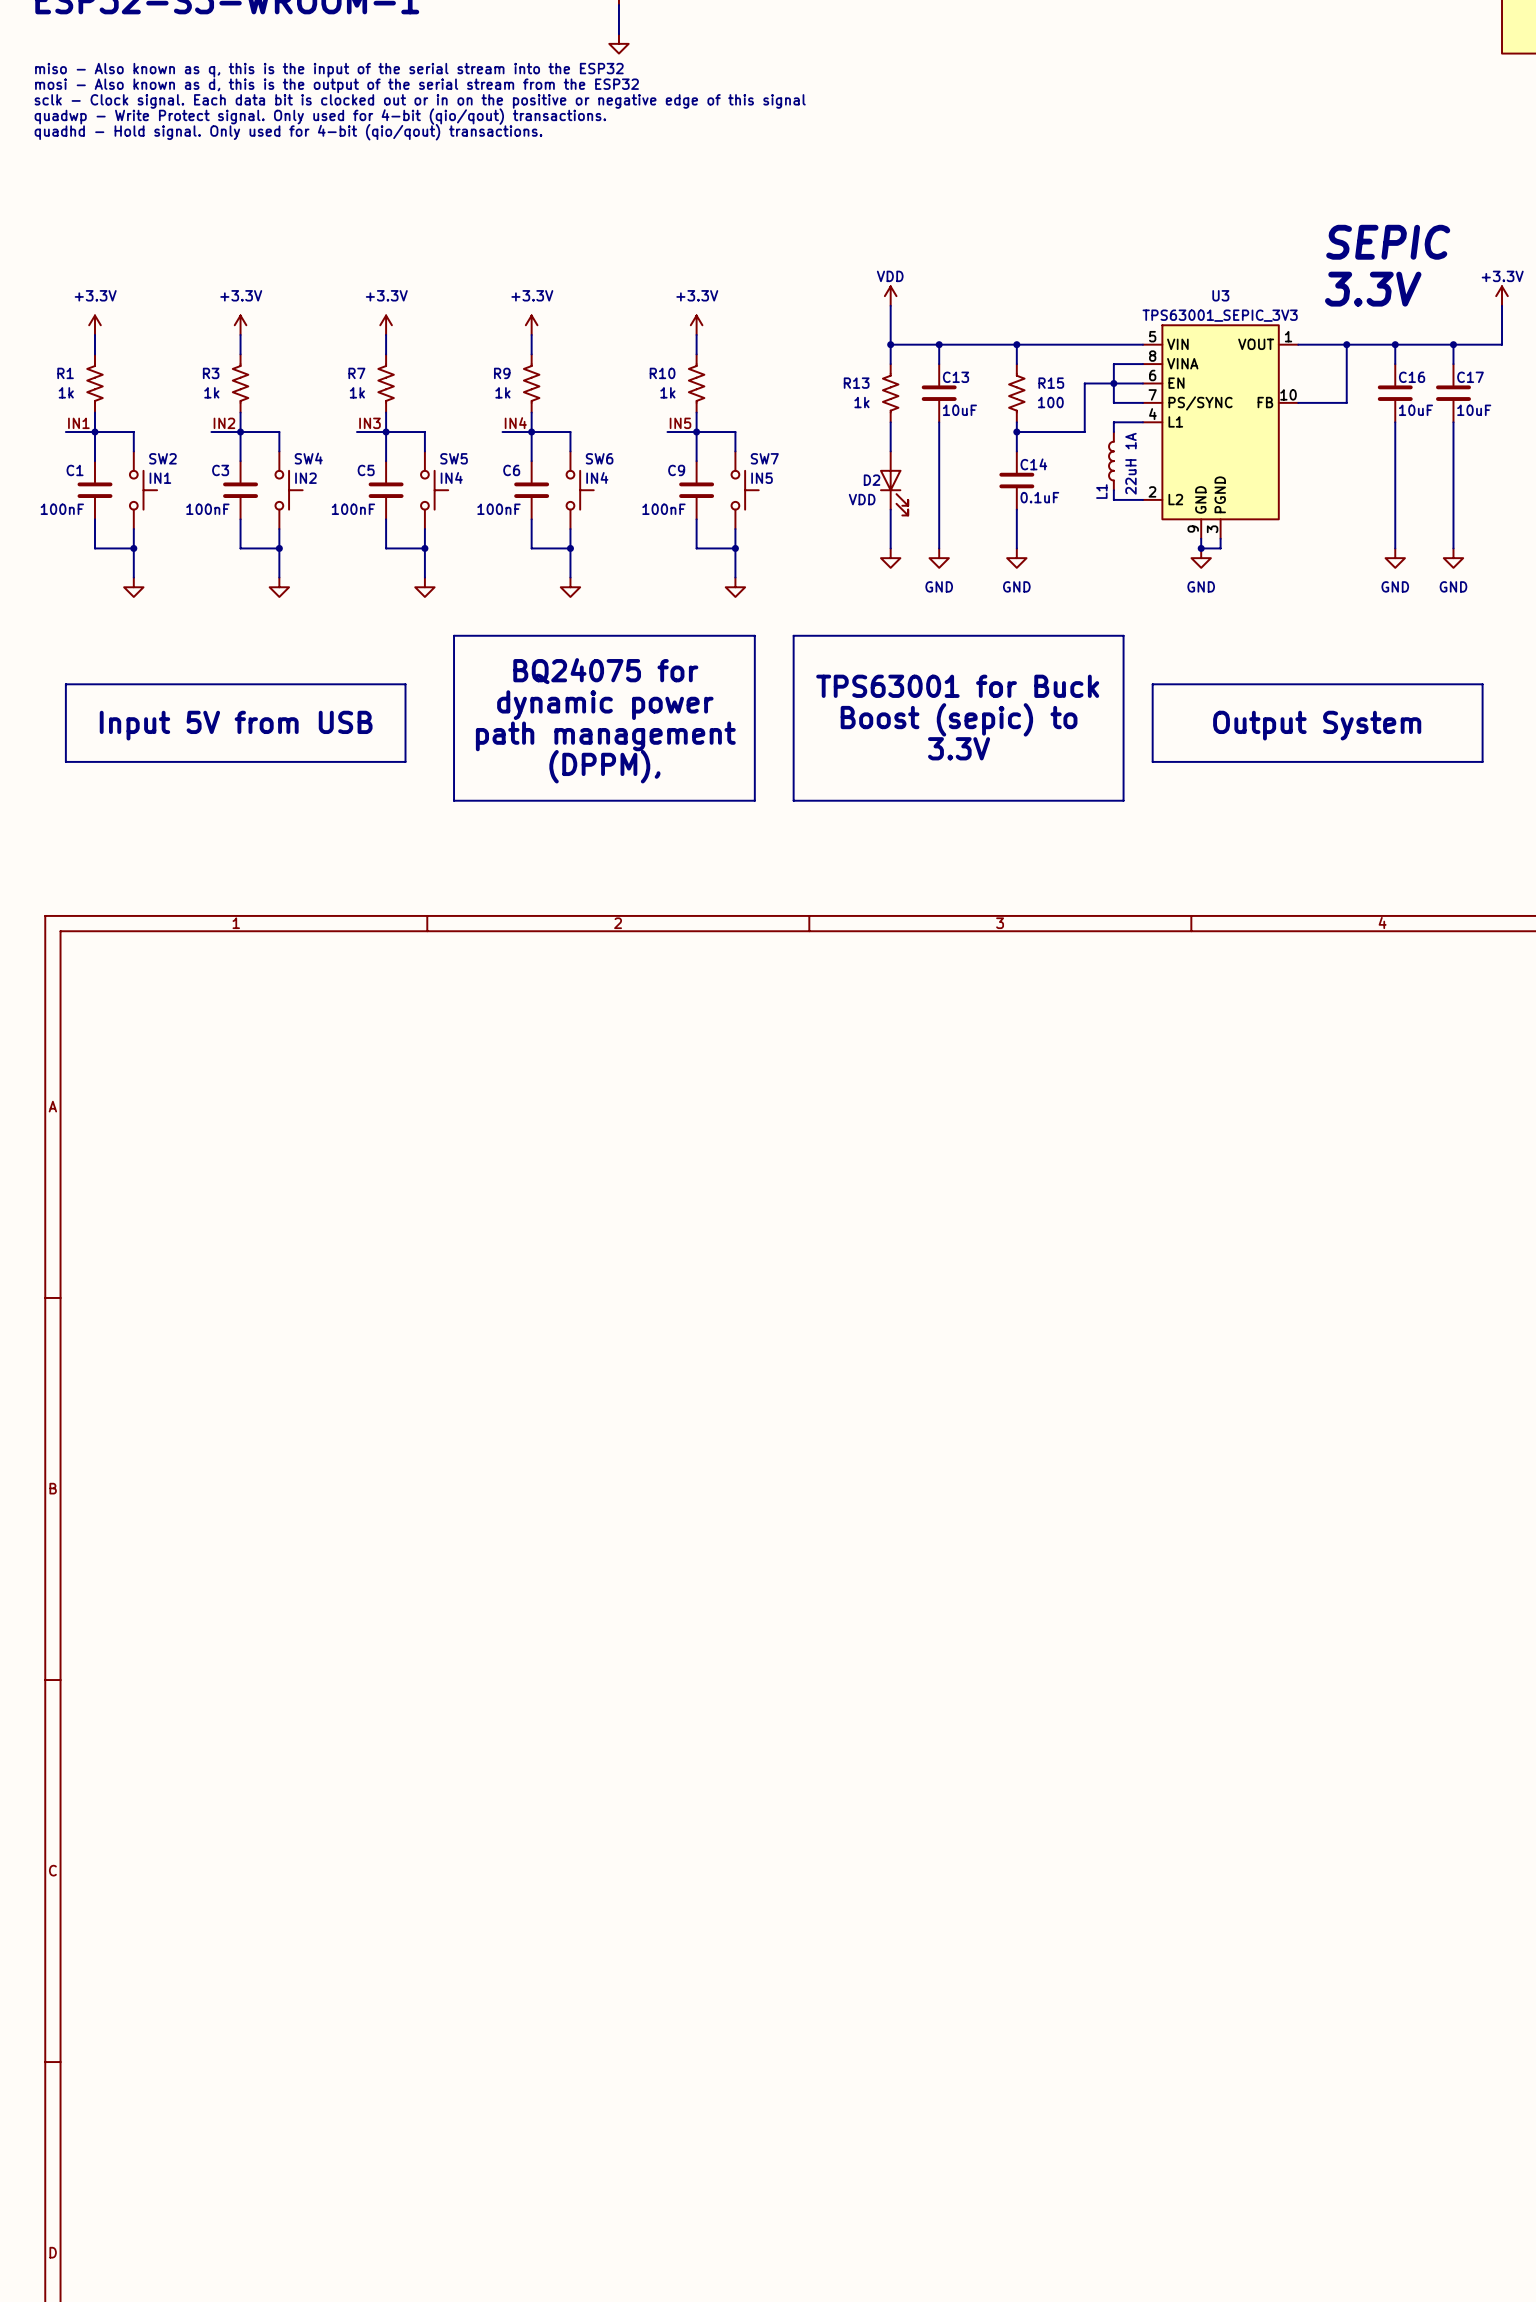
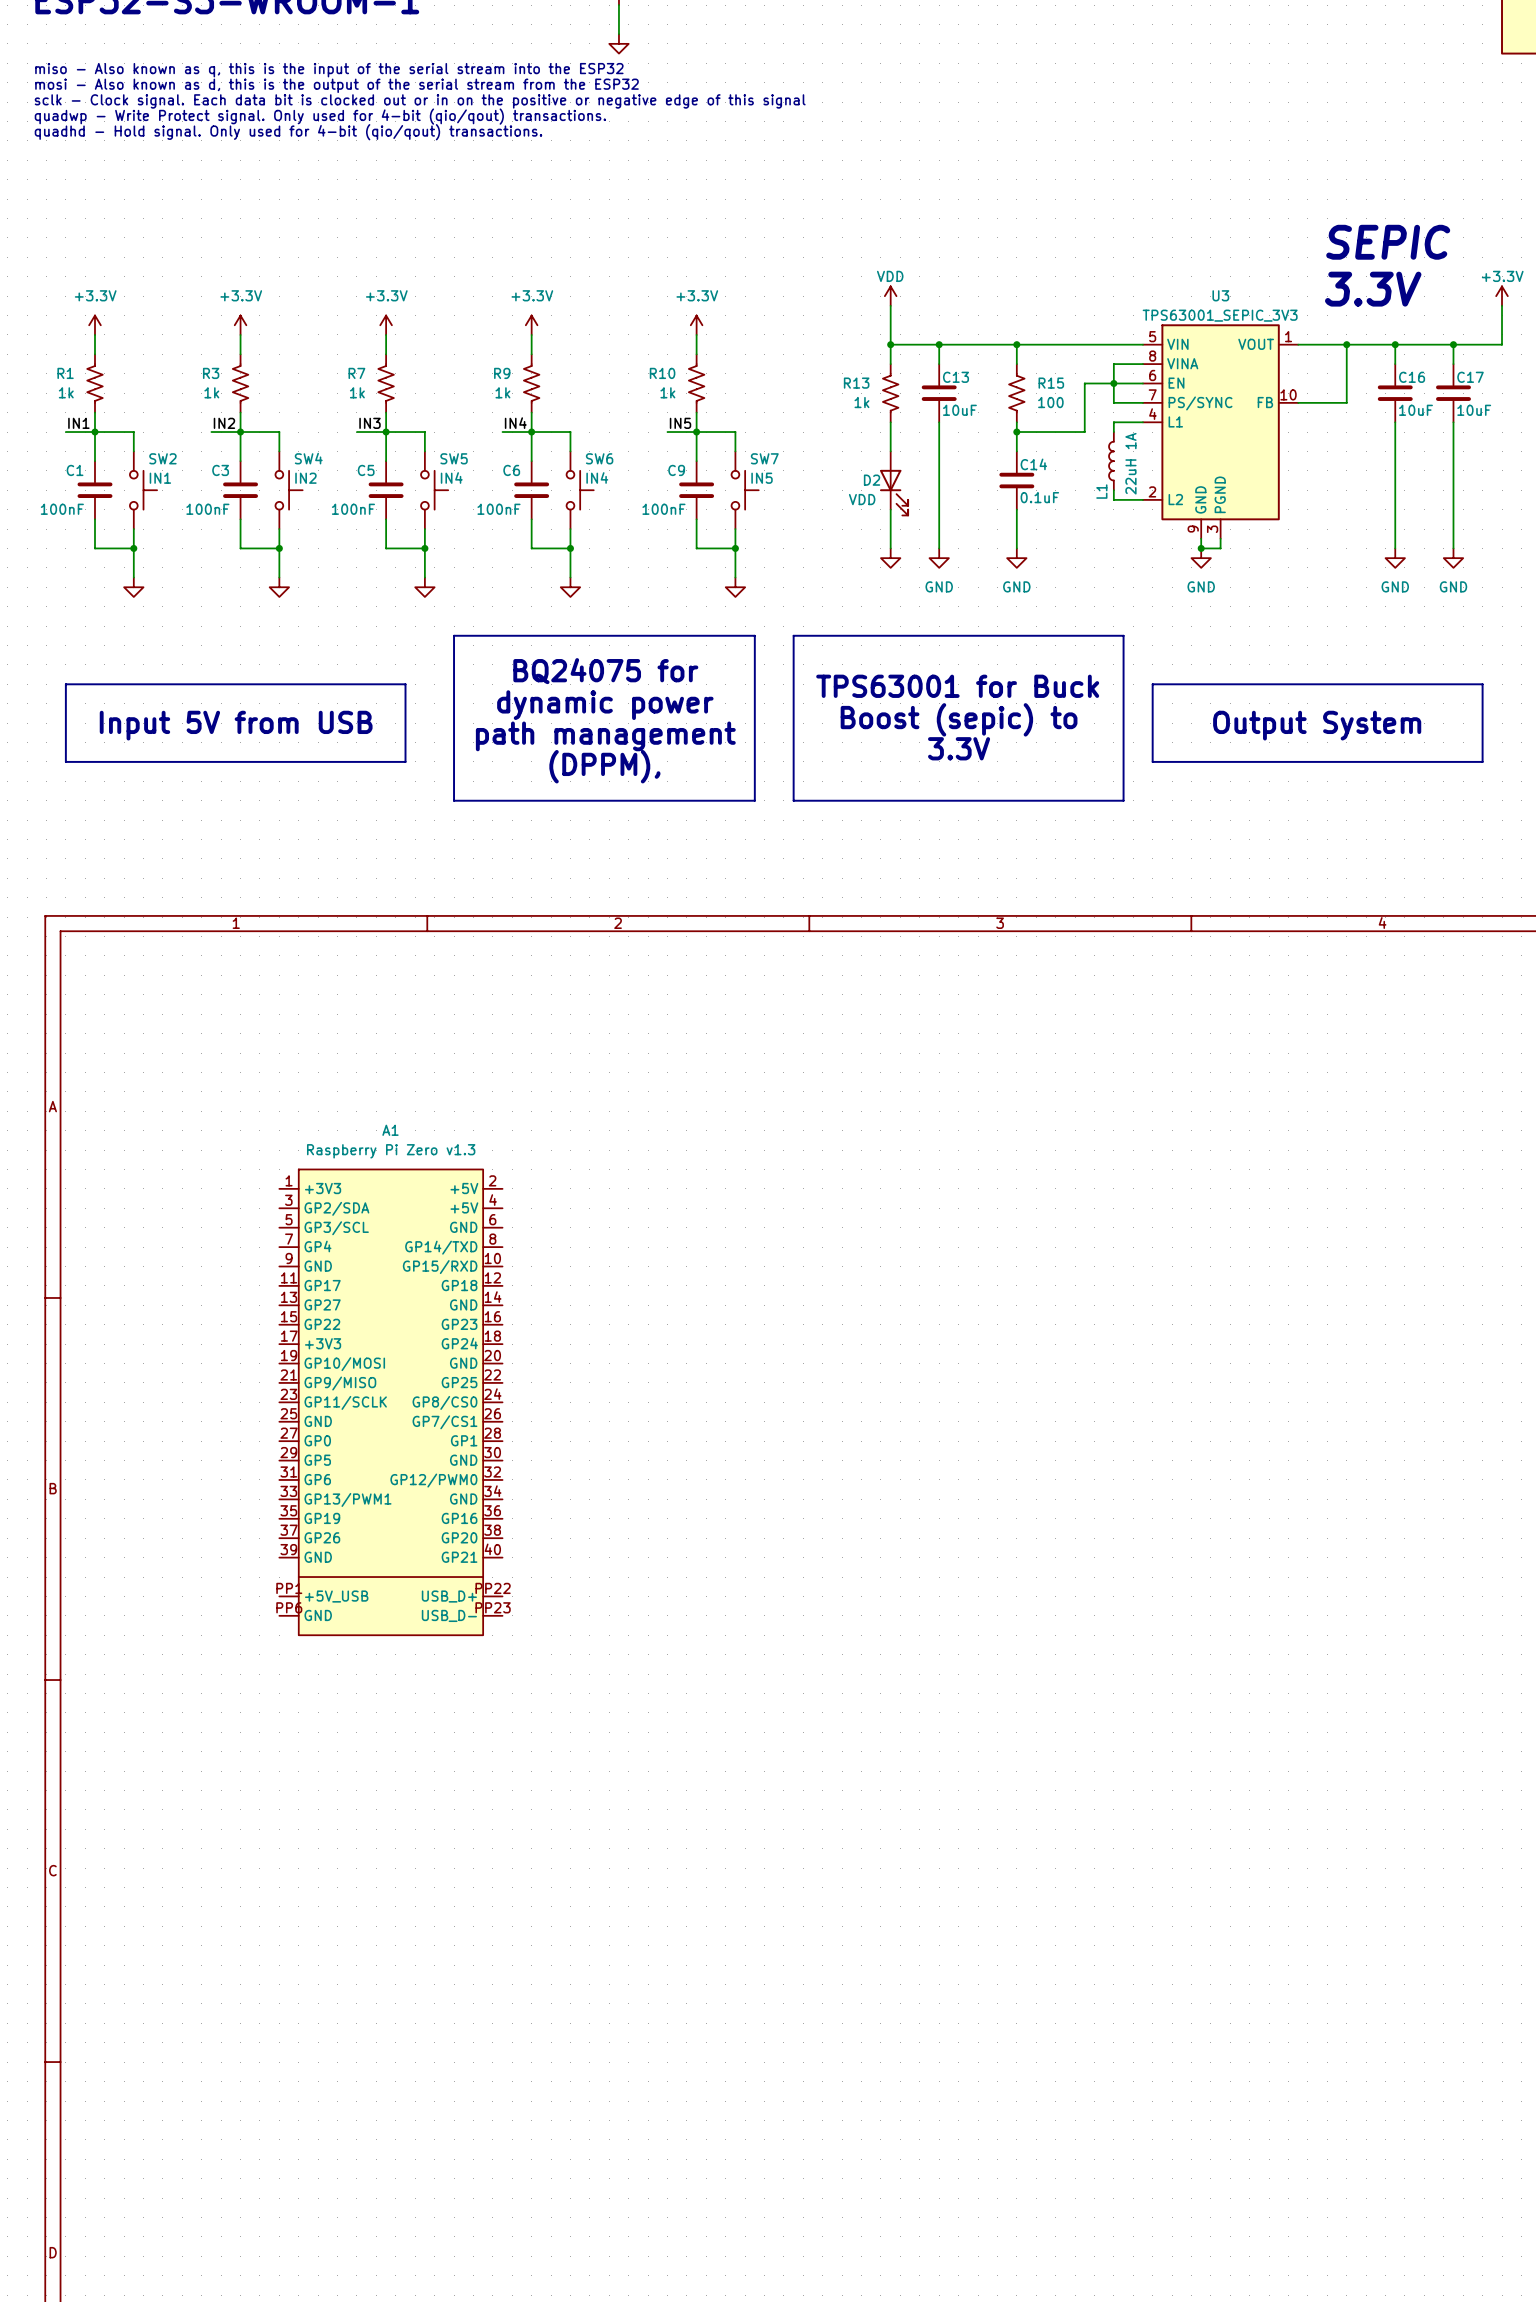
A1: none -> Raspberry Pi Zero v1.3 (390, 1402)

